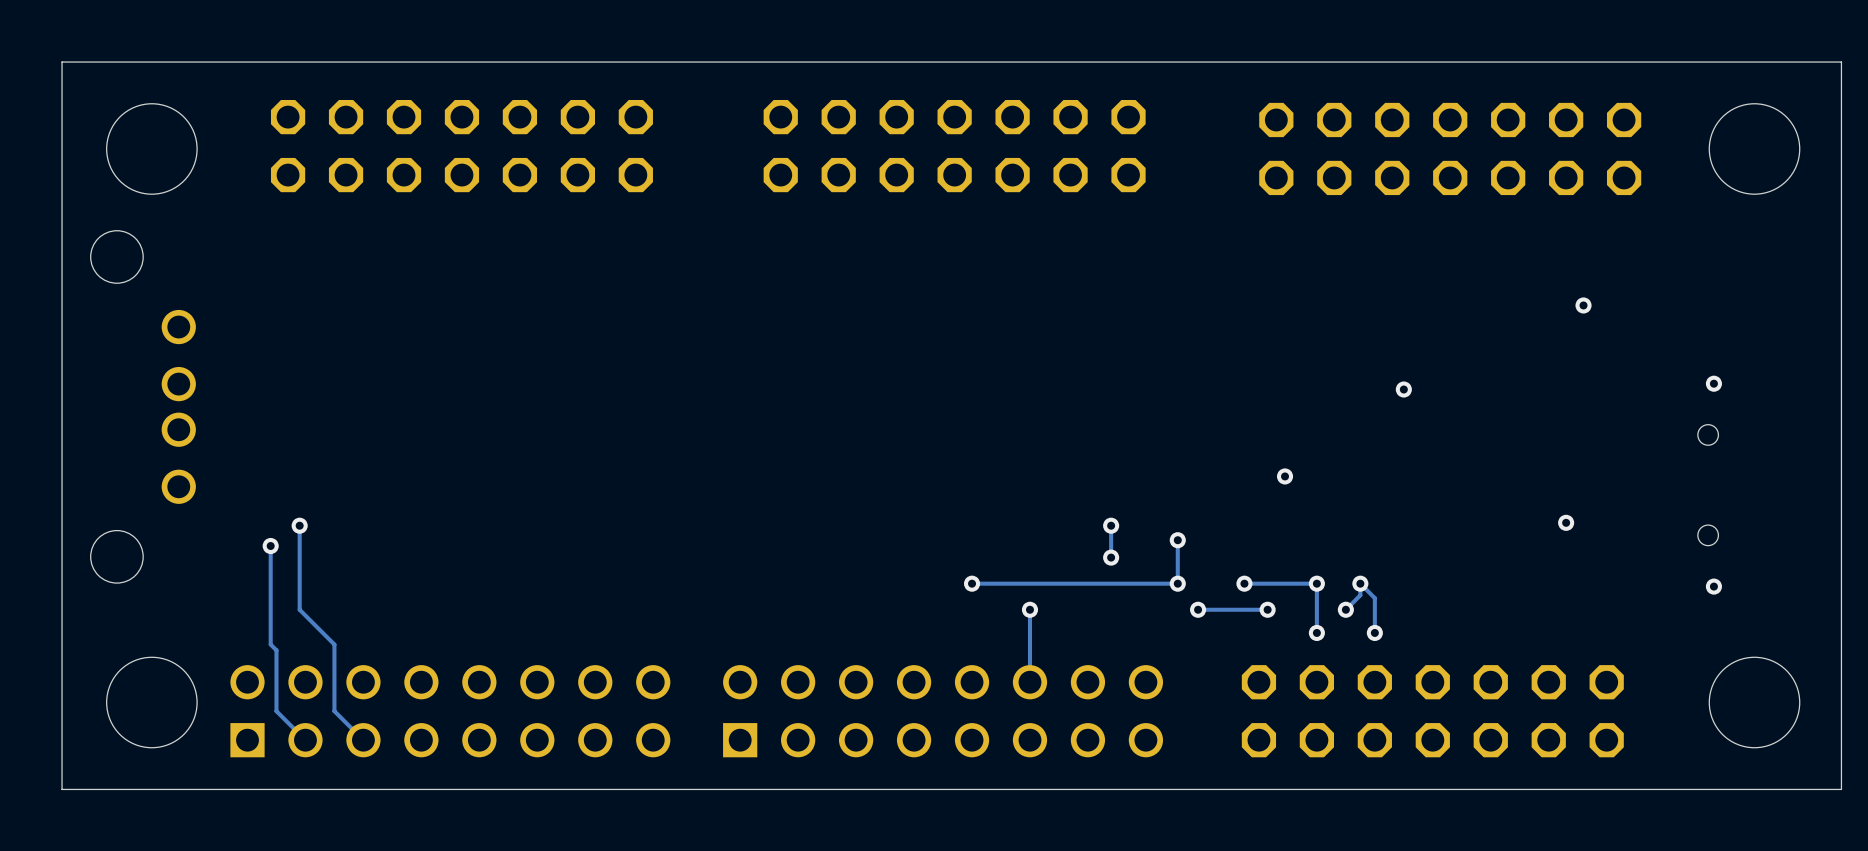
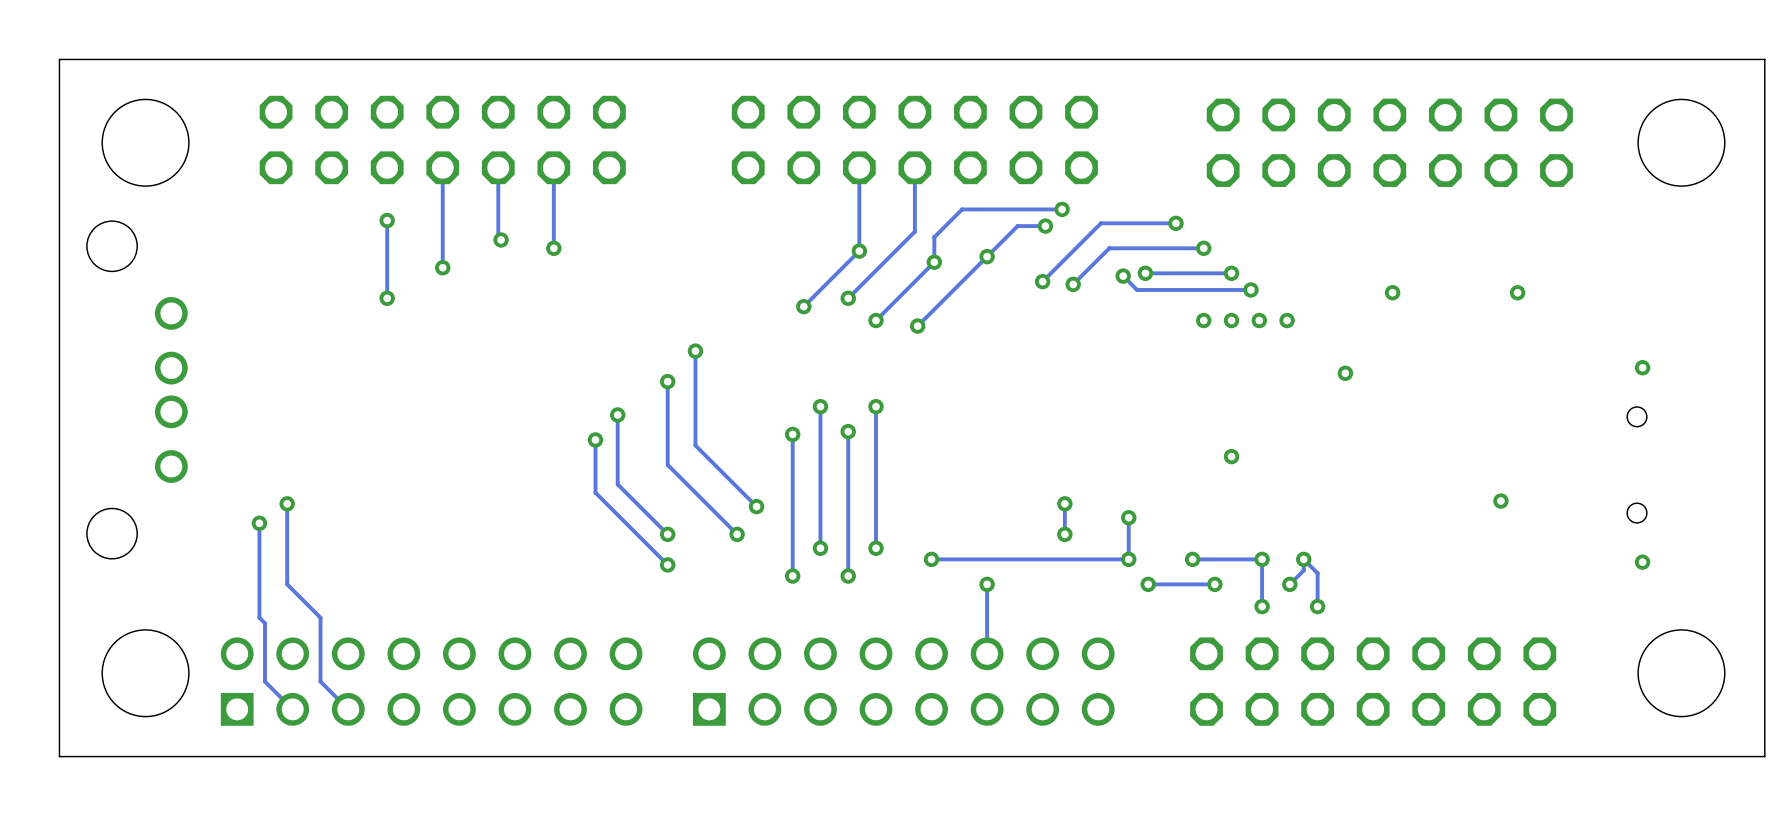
track: none -> (442, 167) (442, 267)
track: none -> (498, 167) (498, 237) (501, 239)
track: none -> (553, 167) (553, 248)
track: none -> (859, 167) (859, 251) (803, 306)
track: none -> (914, 167) (914, 231) (848, 298)
track: none -> (1062, 209) (962, 209) (934, 237) (934, 262) (876, 320)
via: none -> (1062, 209)
track: none -> (387, 220) (387, 298)
via: none -> (387, 220)
track: none -> (1175, 223) (1100, 223) (1042, 281)
via: none -> (1175, 223)
track: none -> (1045, 226) (1017, 226) (917, 326)
via: none -> (1045, 226)
via: none -> (501, 239)
via: none -> (553, 248)
track: none -> (1203, 248) (1109, 248) (1073, 284)
via: none -> (1203, 248)
via: none -> (859, 251)
via: none -> (987, 256)
via: none -> (934, 262)
via: none -> (442, 267)
via: none -> (1145, 273)
track: none -> (1231, 273) (1145, 273)
via: none -> (1231, 273)
track: none -> (1123, 276) (1137, 289) (1250, 289)
via: none -> (1123, 276)
via: none -> (1042, 281)
via: none -> (1073, 284)
via: none -> (1250, 289)
via: none -> (1392, 292)
via: none -> (387, 298)
via: none -> (848, 298)
via: none -> (803, 306)
via: none -> (876, 320)
via: none -> (1203, 320)
via: none -> (1231, 320)
via: none -> (1259, 320)
via: none -> (1287, 320)
via: none -> (917, 326)
track: none -> (695, 351) (695, 445) (756, 506)
via: none -> (695, 351)
track: none -> (667, 381) (667, 464) (737, 534)
via: none -> (667, 381)
track: none -> (820, 406) (820, 548)
via: none -> (820, 406)
track: none -> (876, 406) (876, 548)
via: none -> (876, 406)
track: none -> (617, 414) (617, 484) (667, 534)
via: none -> (617, 414)
track: none -> (848, 431) (848, 576)
via: none -> (848, 431)
track: none -> (792, 434) (792, 576)
via: none -> (792, 434)
track: none -> (595, 439) (595, 492) (667, 564)
via: none -> (595, 439)
via: none -> (756, 506)
via: none -> (667, 534)
via: none -> (737, 534)
via: none -> (820, 548)
via: none -> (876, 548)
via: none -> (667, 564)
via: none -> (792, 576)
via: none -> (848, 576)

